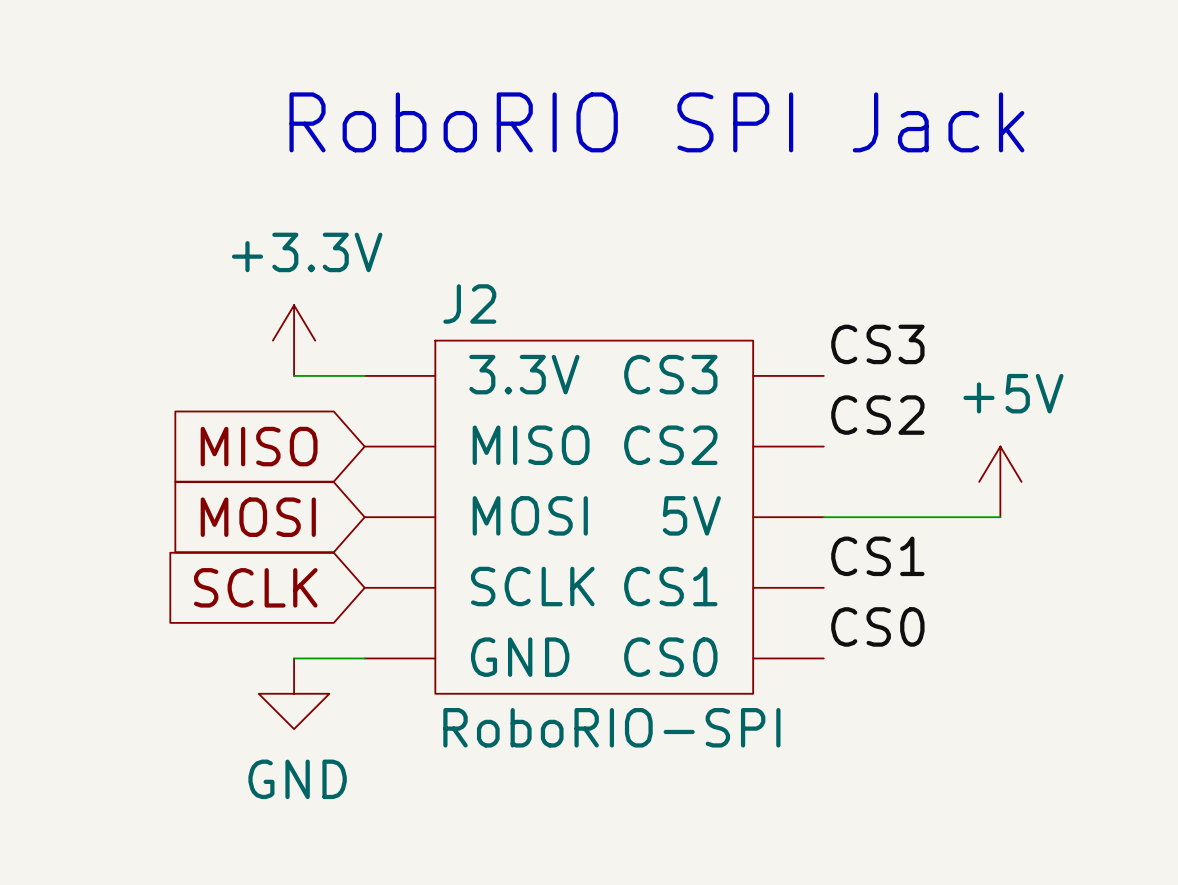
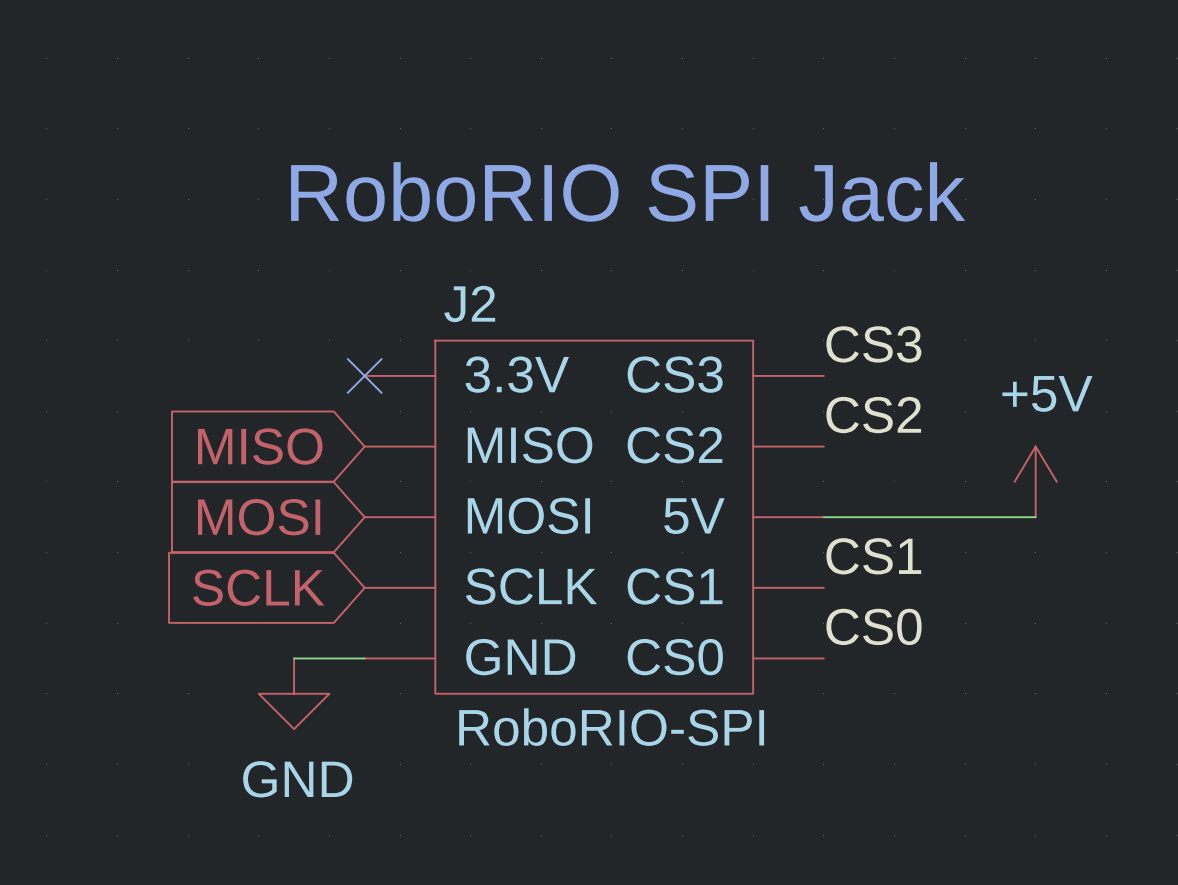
text position: RoboRIO SPI Jack (656, 122) -> RoboRIO SPI Jack (628, 191)
power symbol: +3.3V (294, 340) -> none
wire: (294, 375) (364, 375) -> none
no-connect mark: none -> (364, 375)
power symbol position: +5V (1000, 481) -> +5V (1035, 481)
wire: none -> (1000, 517) (1035, 517)

